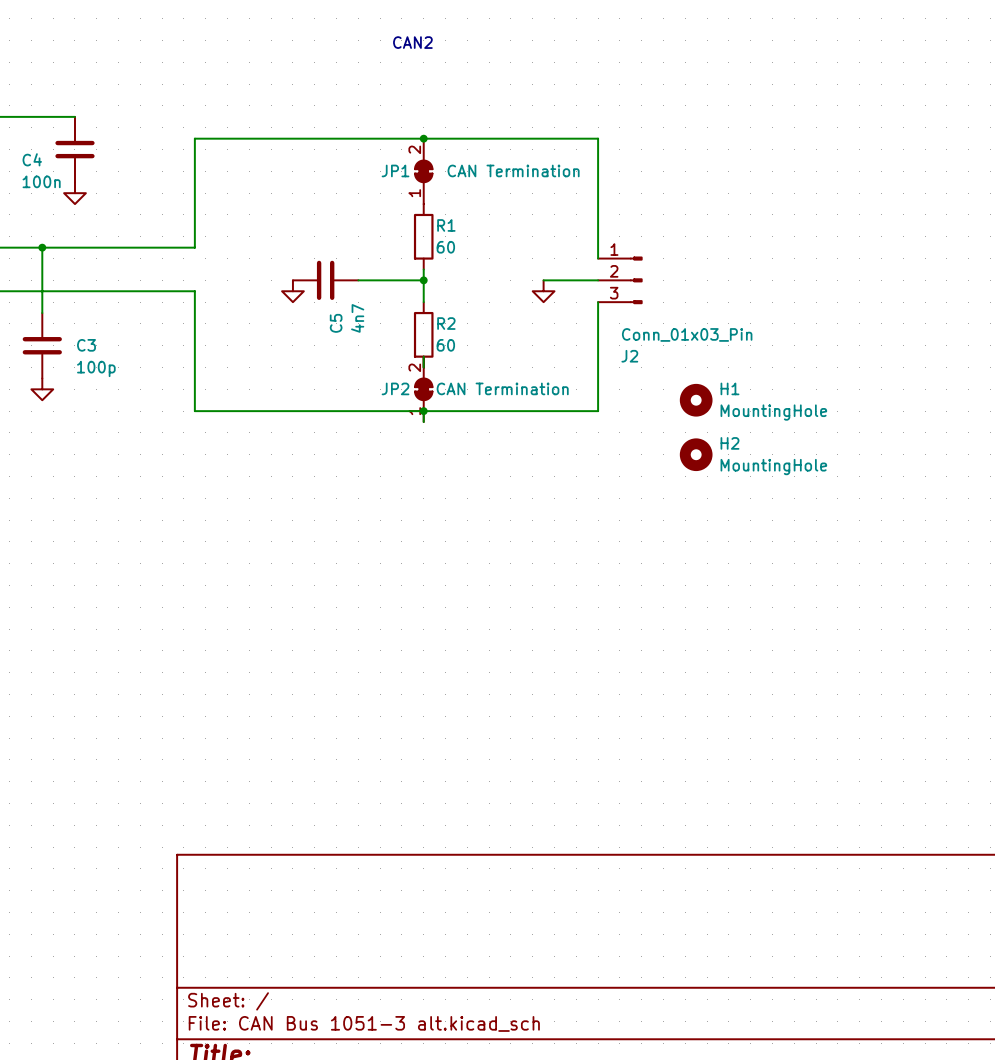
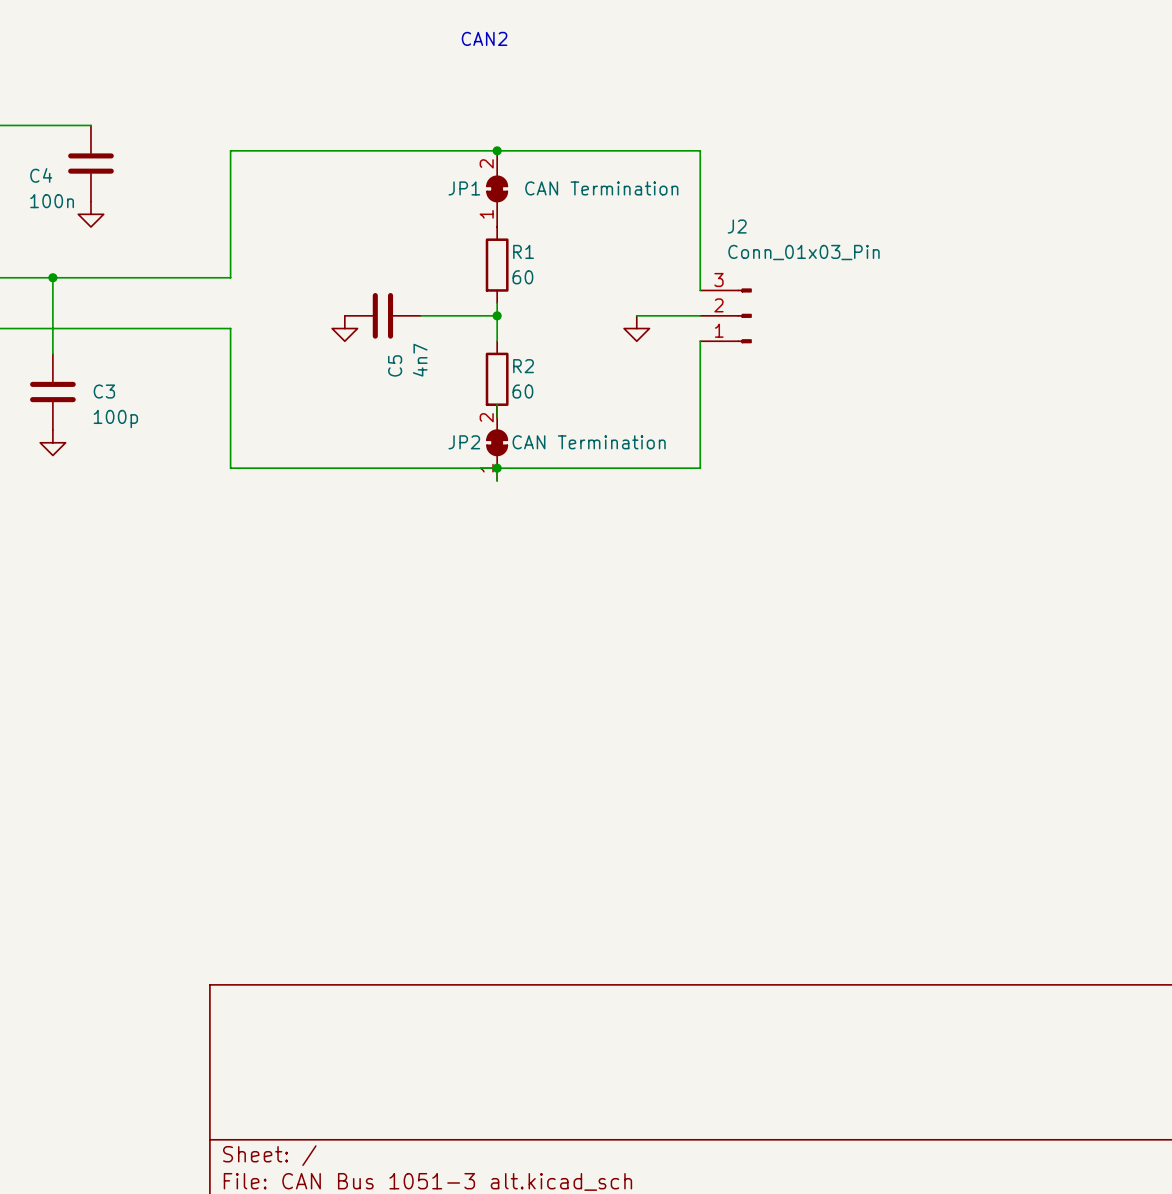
J2 flip: as is (636, 280) -> up-down (744, 315)
H1: MountingHole (696, 400) -> none
H2: MountingHole (696, 454) -> none

